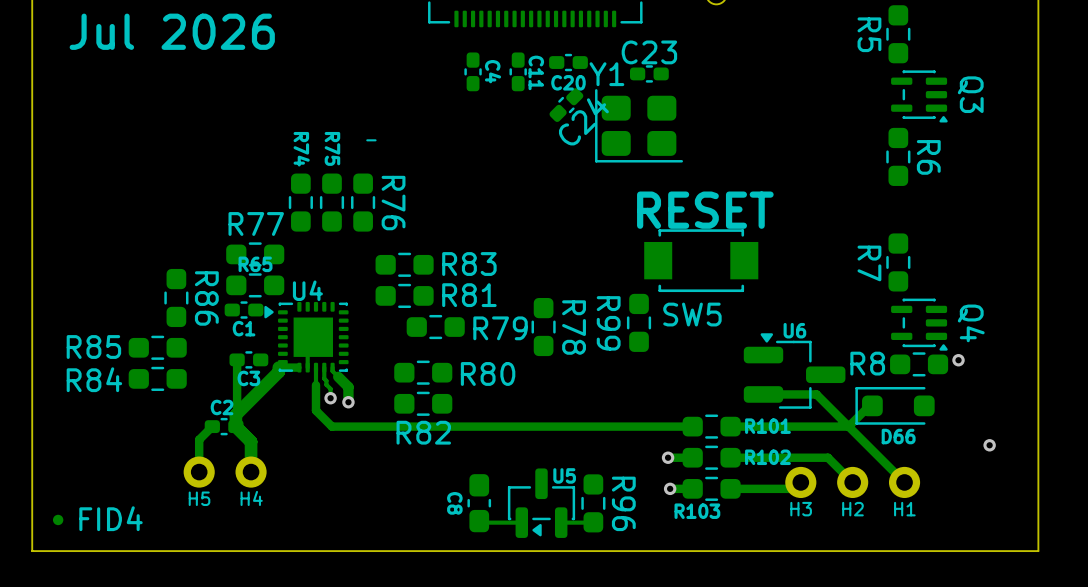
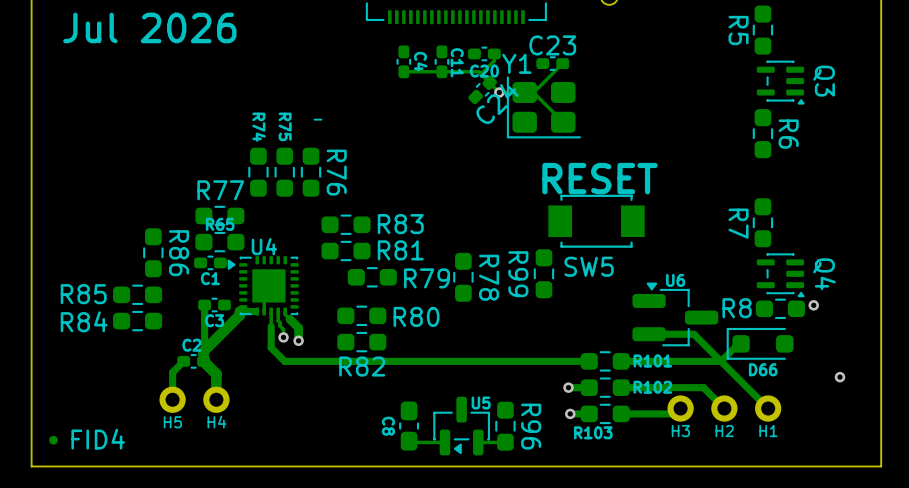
track: none -> (494, 53) (494, 60) (480, 74)
track: none -> (562, 63) (533, 92) (499, 92) (478, 71) (403, 71)
via: none -> (499, 92)
track: none -> (533, 92) (563, 122)

